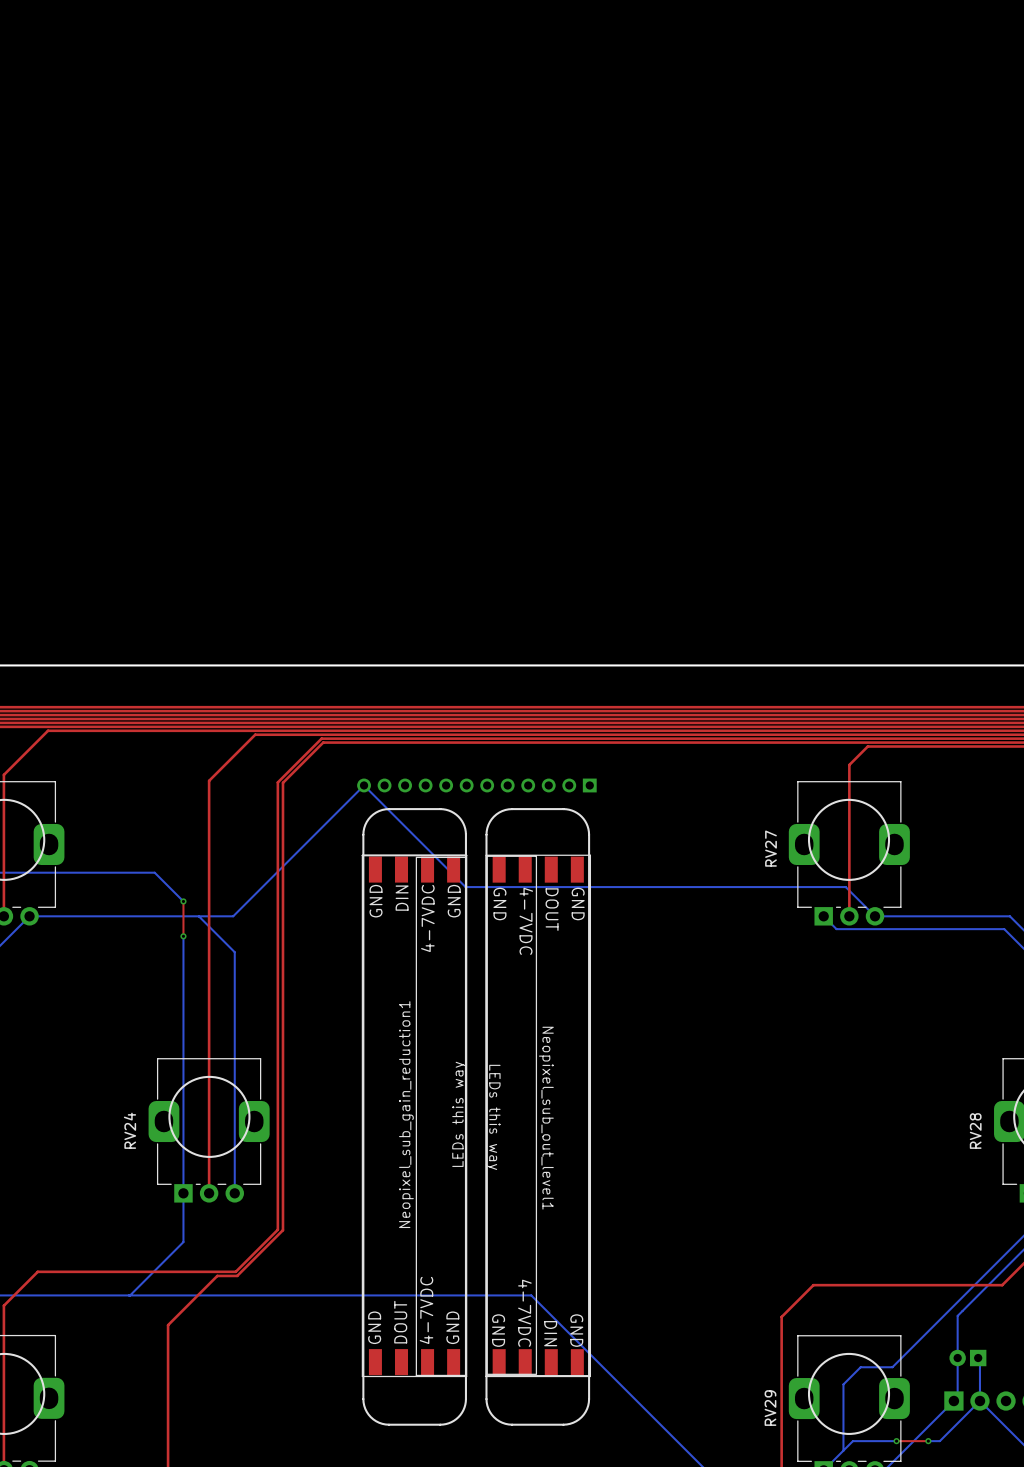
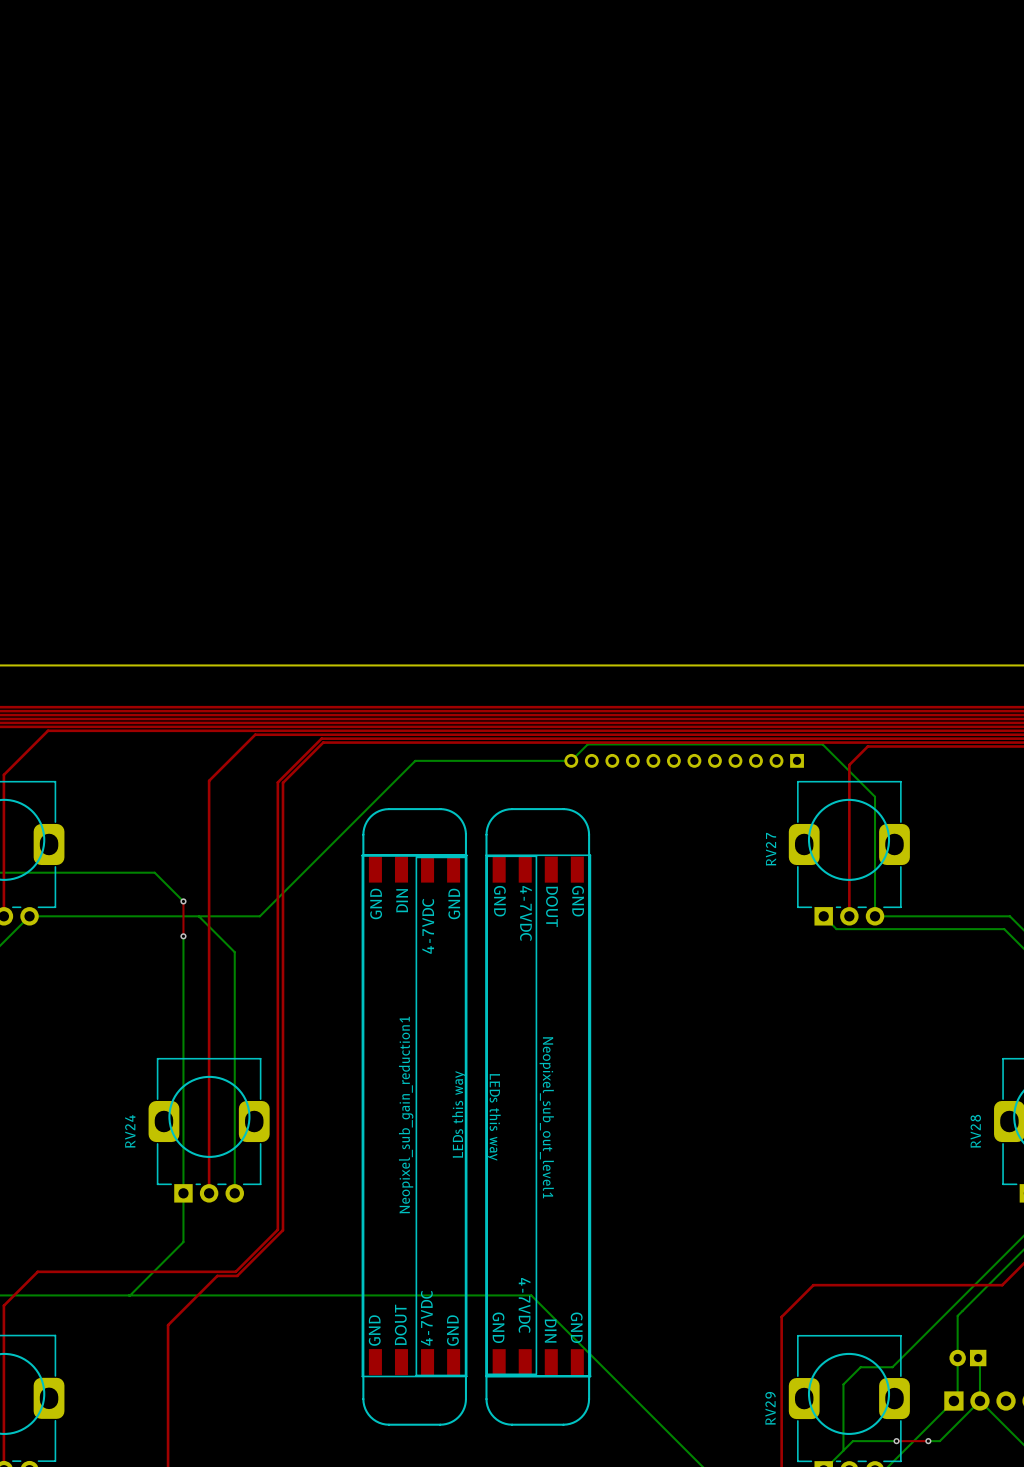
part position: (476, 785) -> (684, 760)
bottom track: (233, 916) (364, 785) (465, 887) (845, 887) (875, 916) -> (233, 916) (259, 916) (415, 760) (571, 760) (587, 744) (822, 744) (875, 796) (875, 916)

